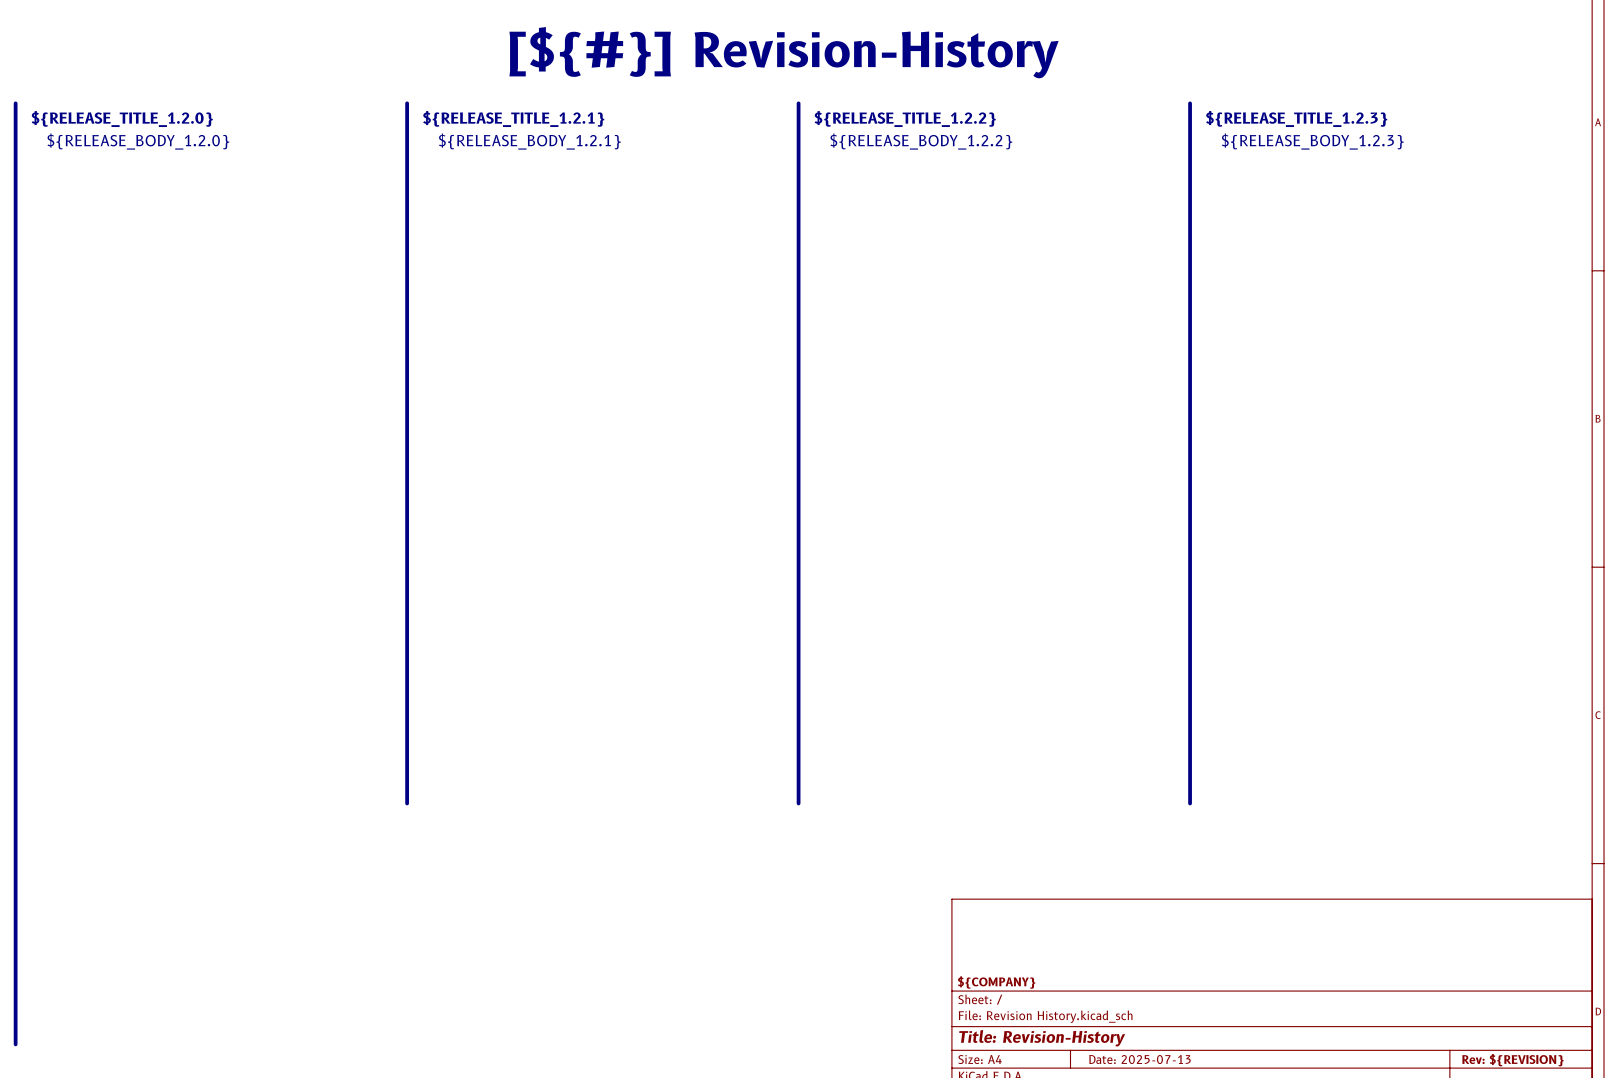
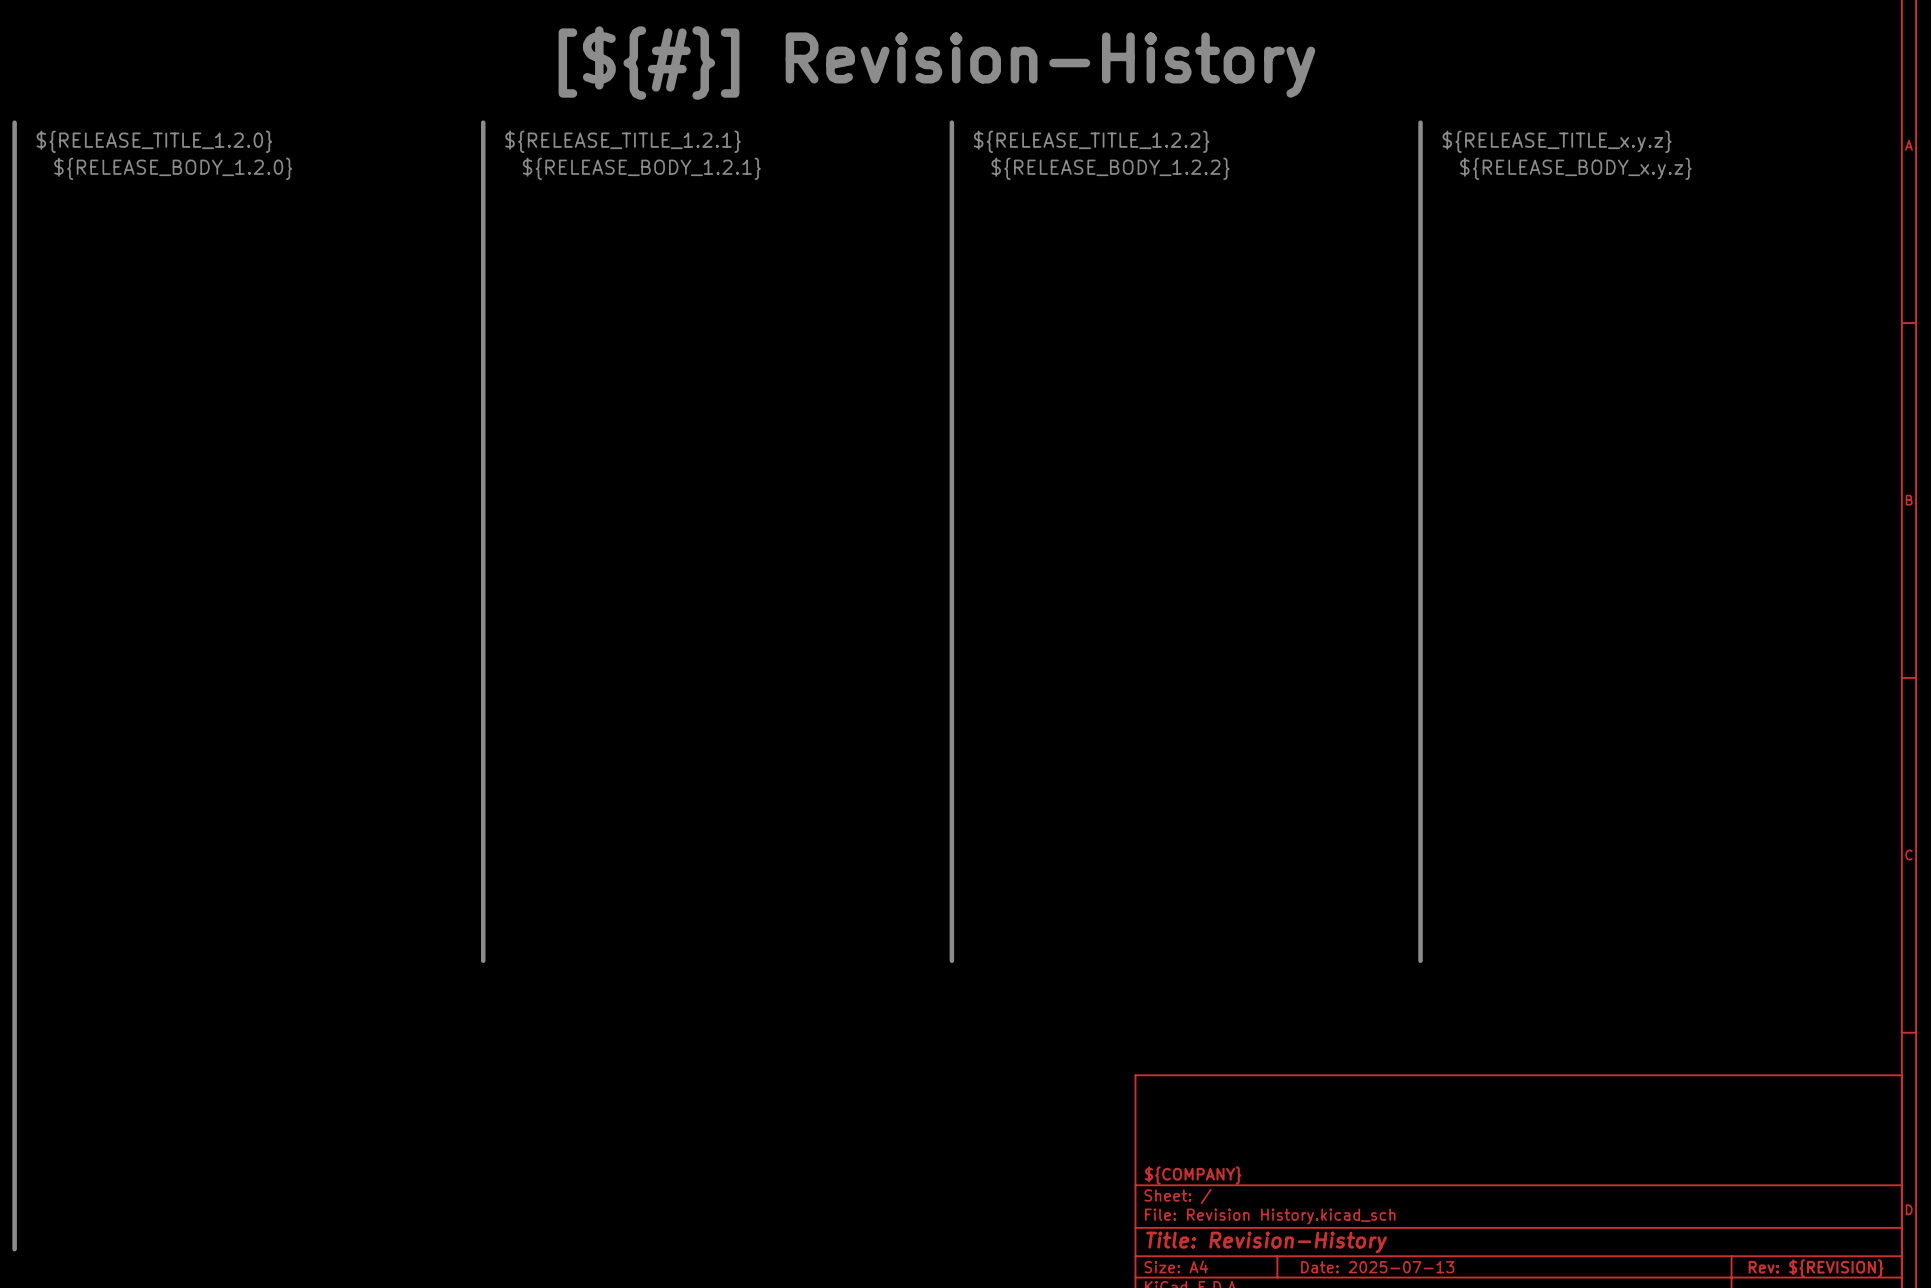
text: ${RELEASE_TITLE_1.2.3} (1296, 118) -> ${RELEASE_TITLE_x.y.z} (1557, 141)
text: ${RELEASE_BODY_1.2.3} (1312, 141) -> ${RELEASE_BODY_x.y.z} (1575, 168)

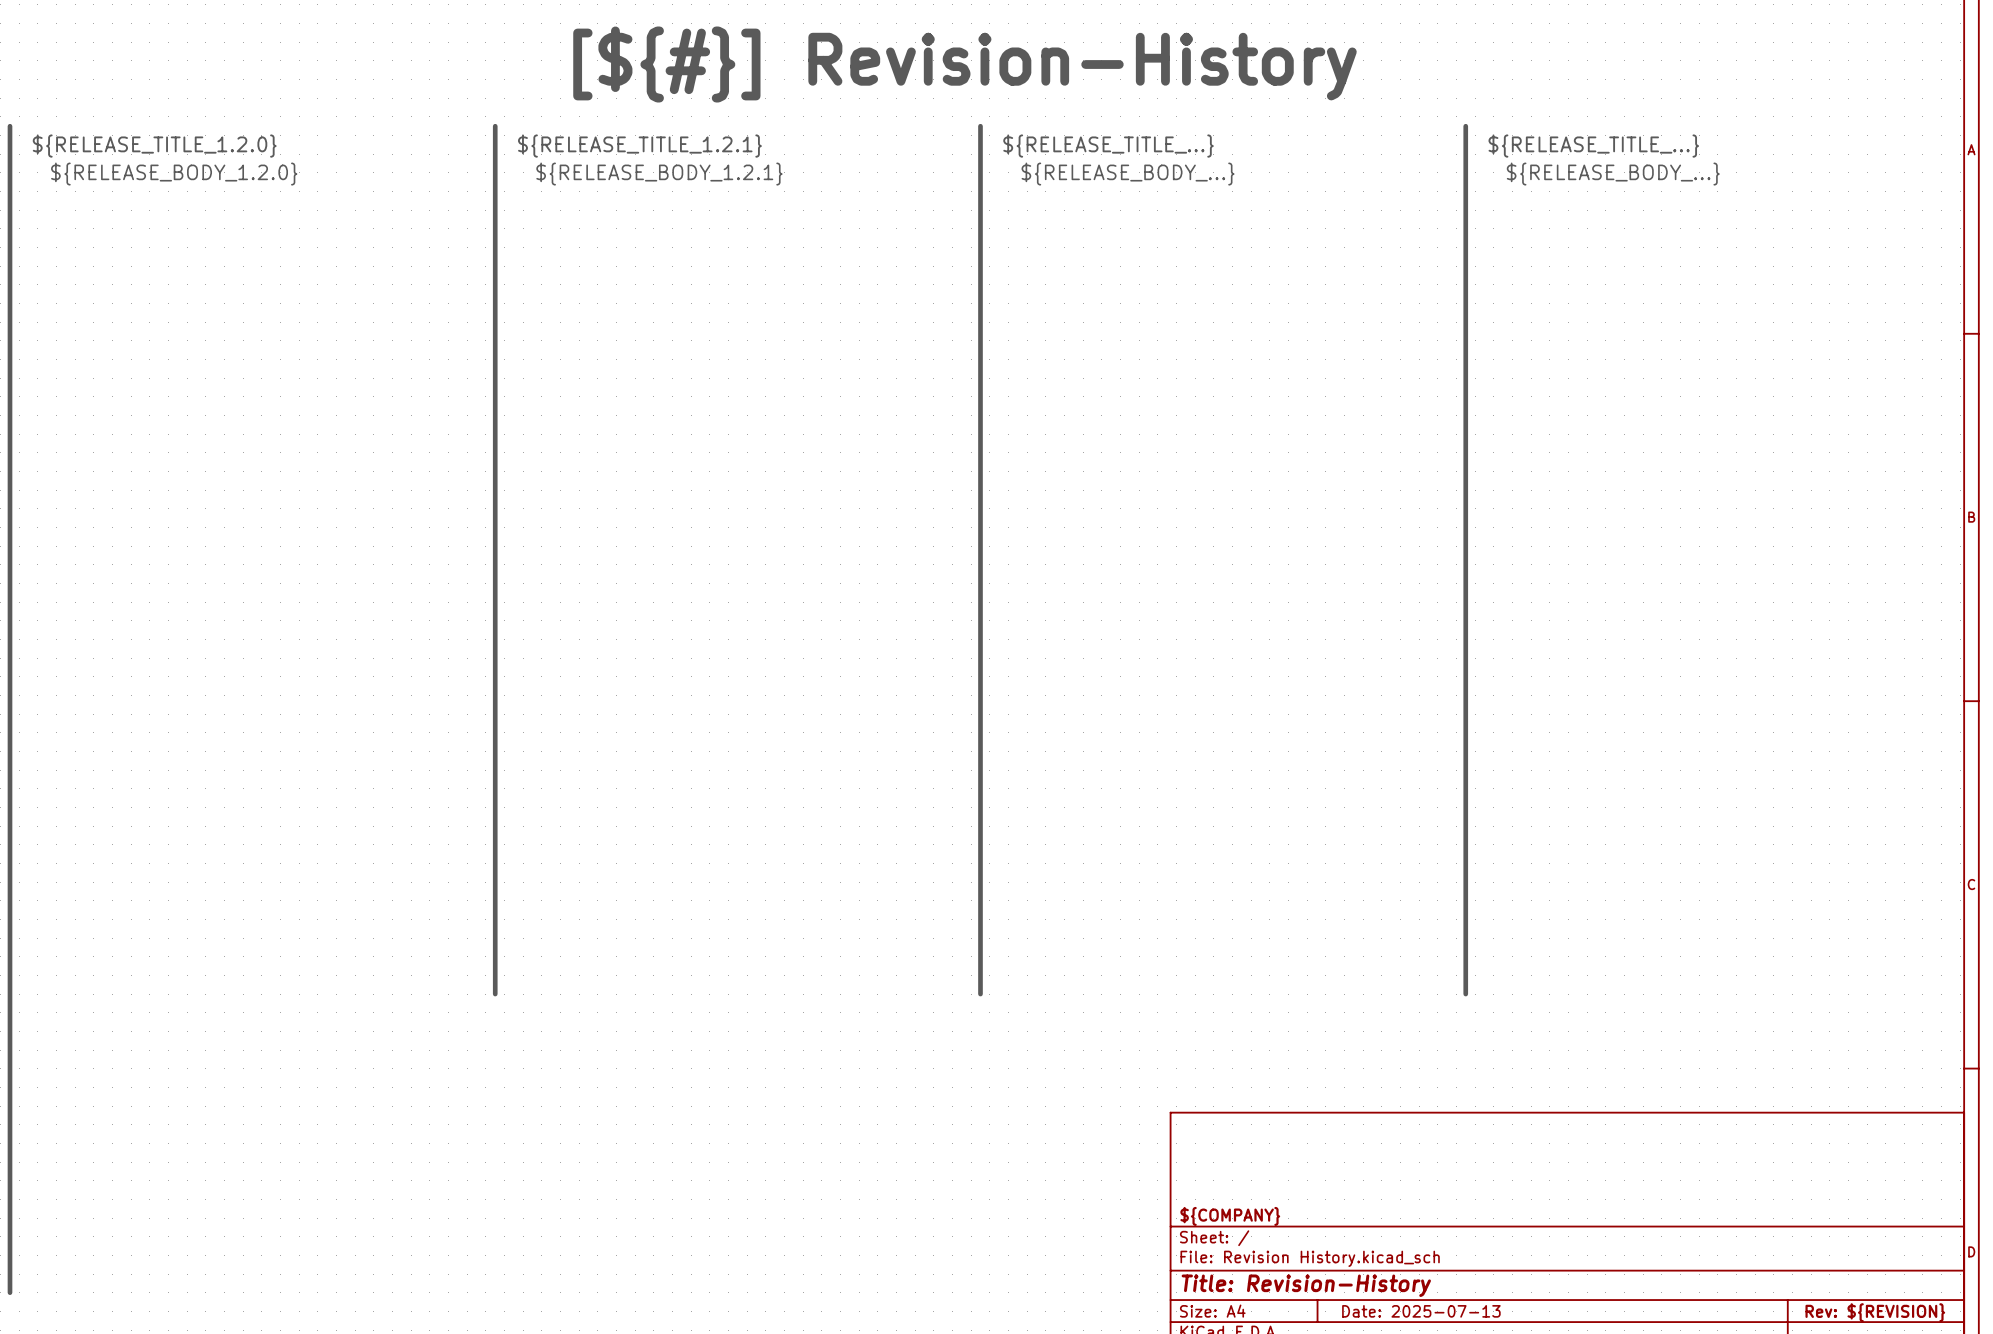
text: ${RELEASE_TITLE_1.2.2} (1091, 141) -> ${RELEASE_TITLE_...} (1108, 146)
text: ${RELEASE_TITLE_x.y.z} (1557, 141) -> ${RELEASE_TITLE_...} (1593, 146)
text: ${RELEASE_BODY_1.2.2} (1110, 168) -> ${RELEASE_BODY_...} (1128, 174)
text: ${RELEASE_BODY_x.y.z} (1575, 168) -> ${RELEASE_BODY_...} (1613, 174)

